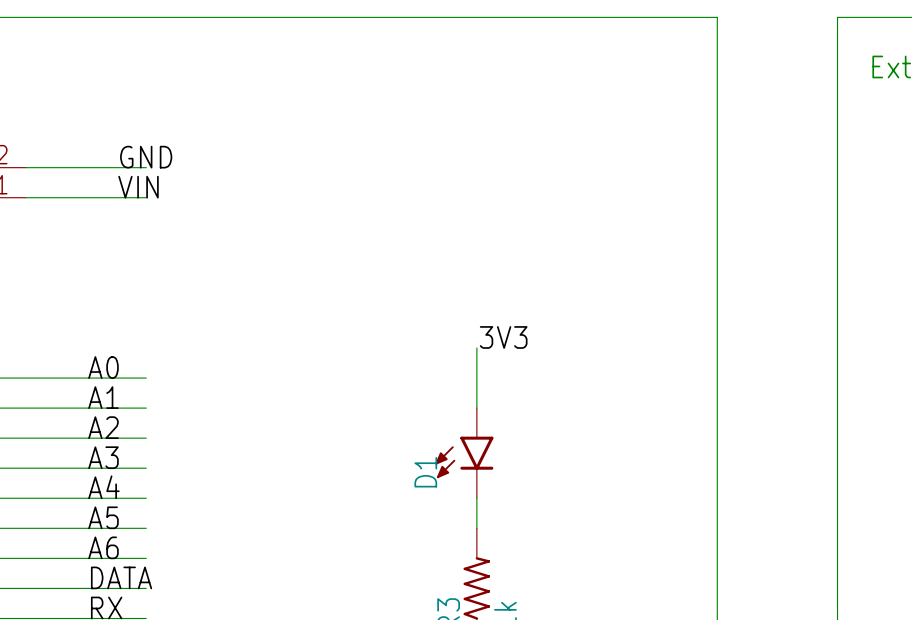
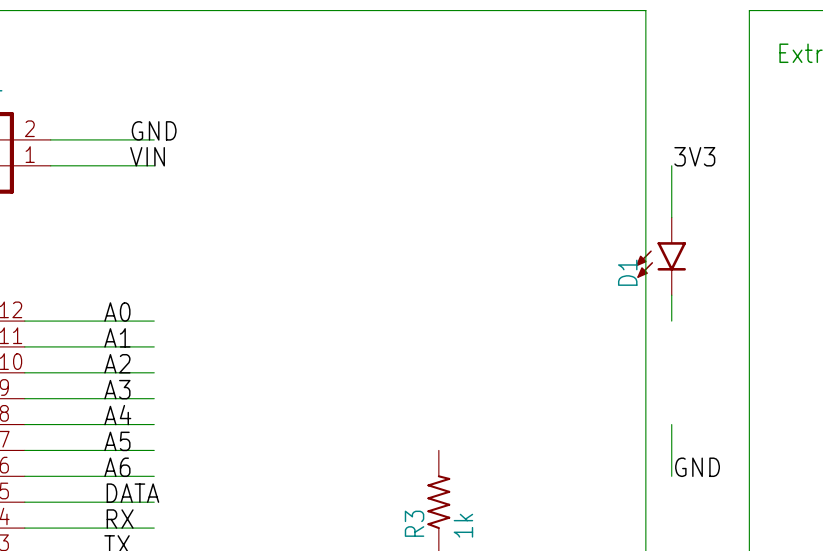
label: none -> 3V3 (694, 156)
wire: none -> (671, 165) (671, 217)
label: 3V3 (503, 337) -> none
wire: (476, 347) (476, 408) -> none
wire: none -> (671, 295) (671, 321)
D1 position: (464, 453) -> (661, 256)
wire: (476, 498) (476, 528) -> none
wire: none -> (671, 424) (671, 476)
label: none -> GND (697, 467)

